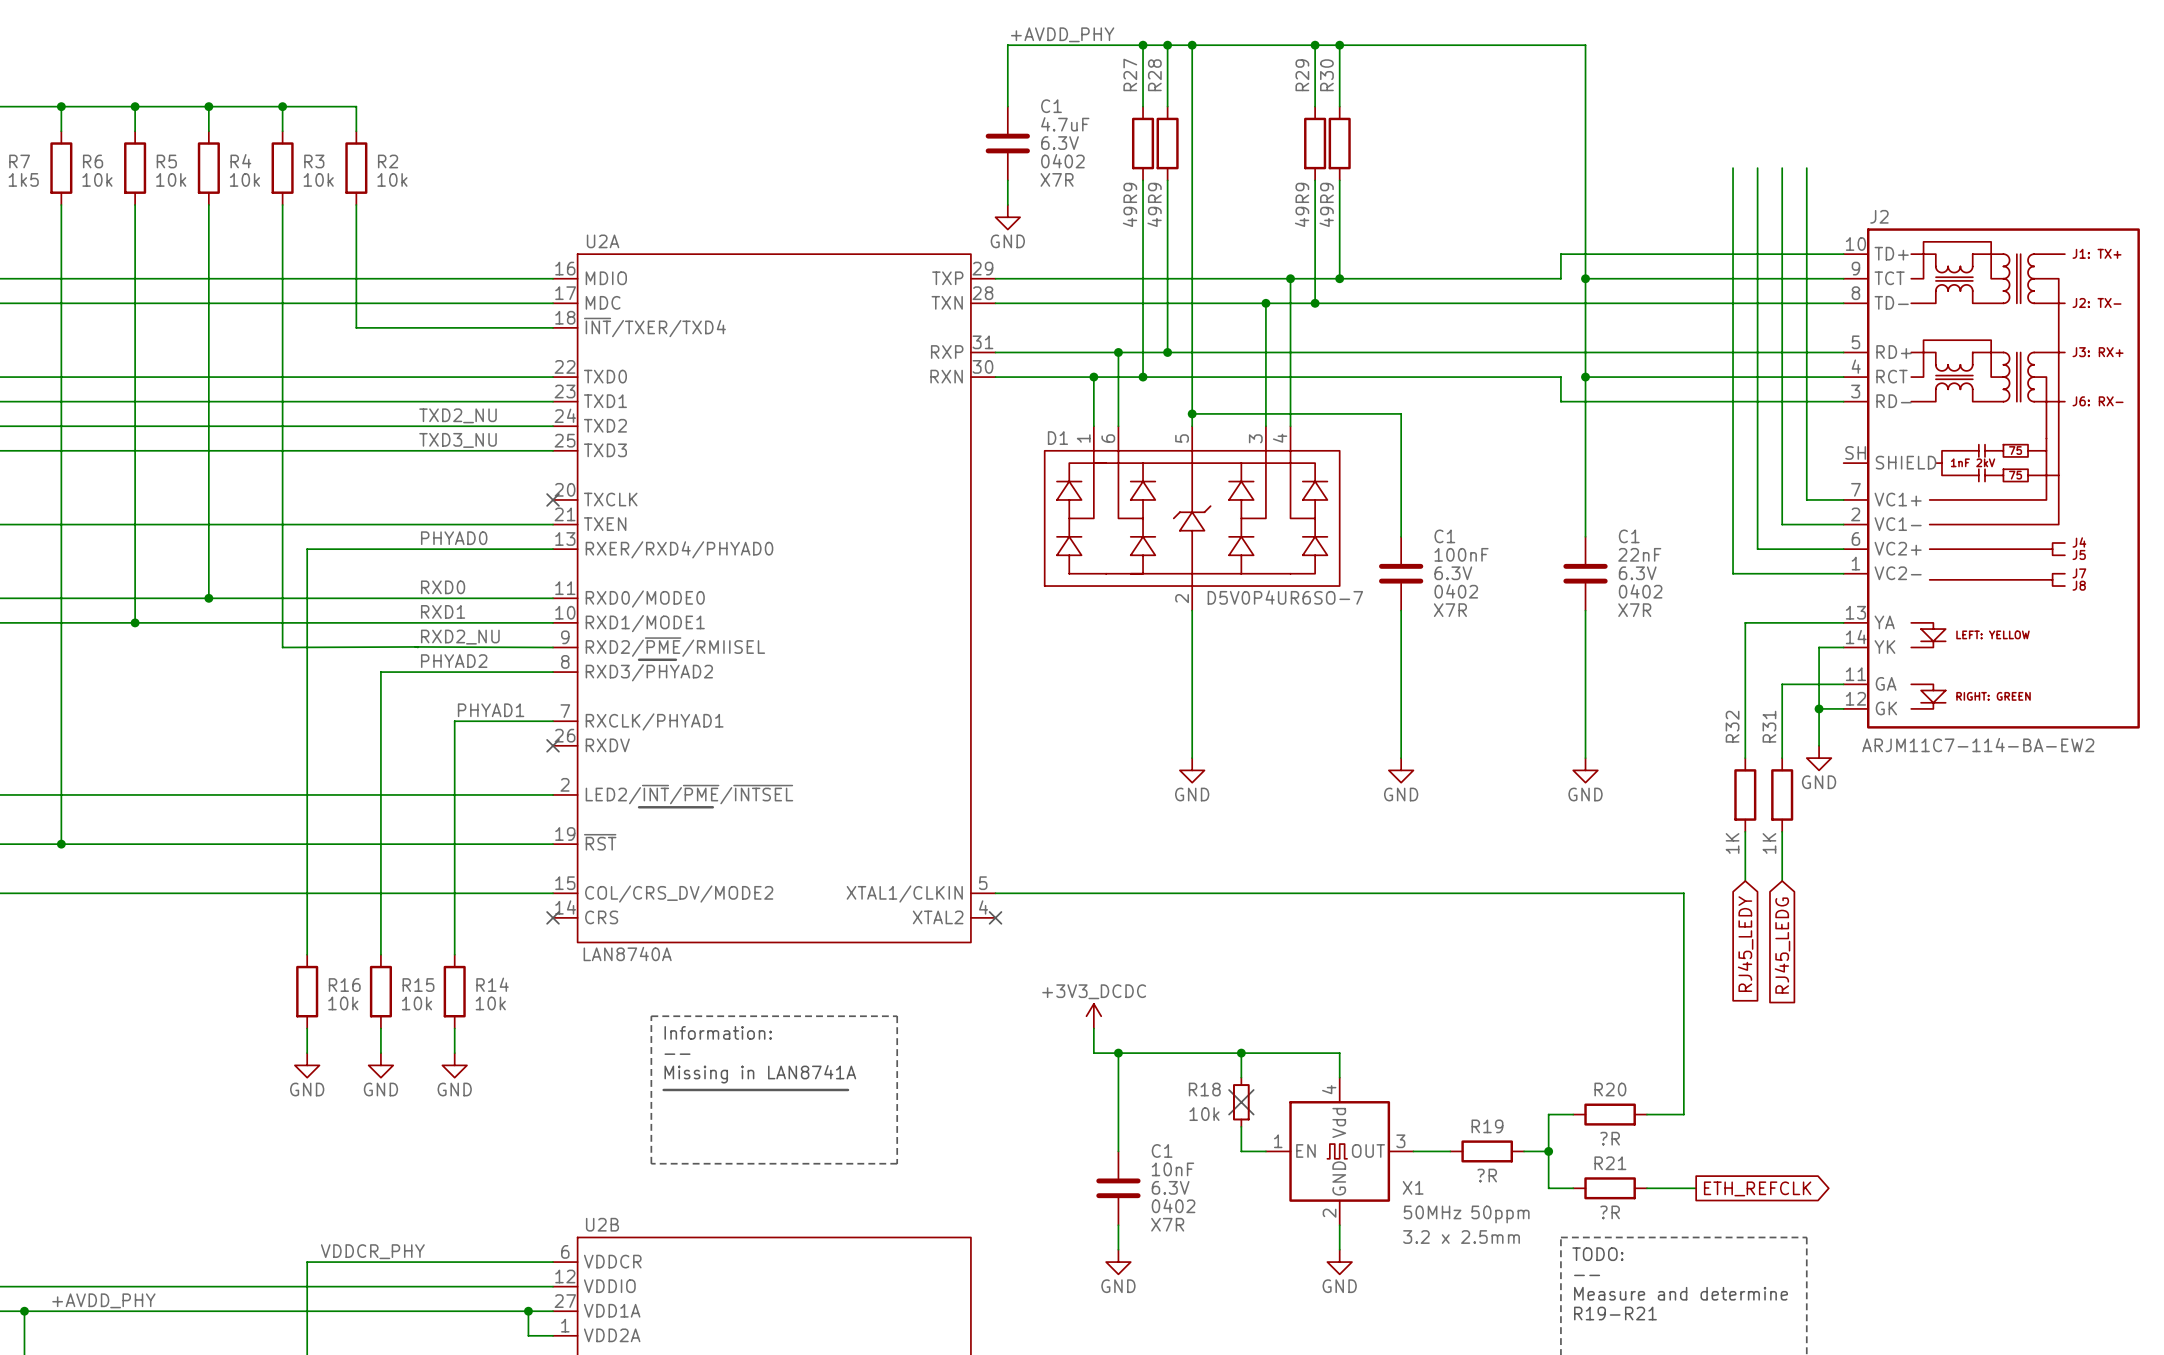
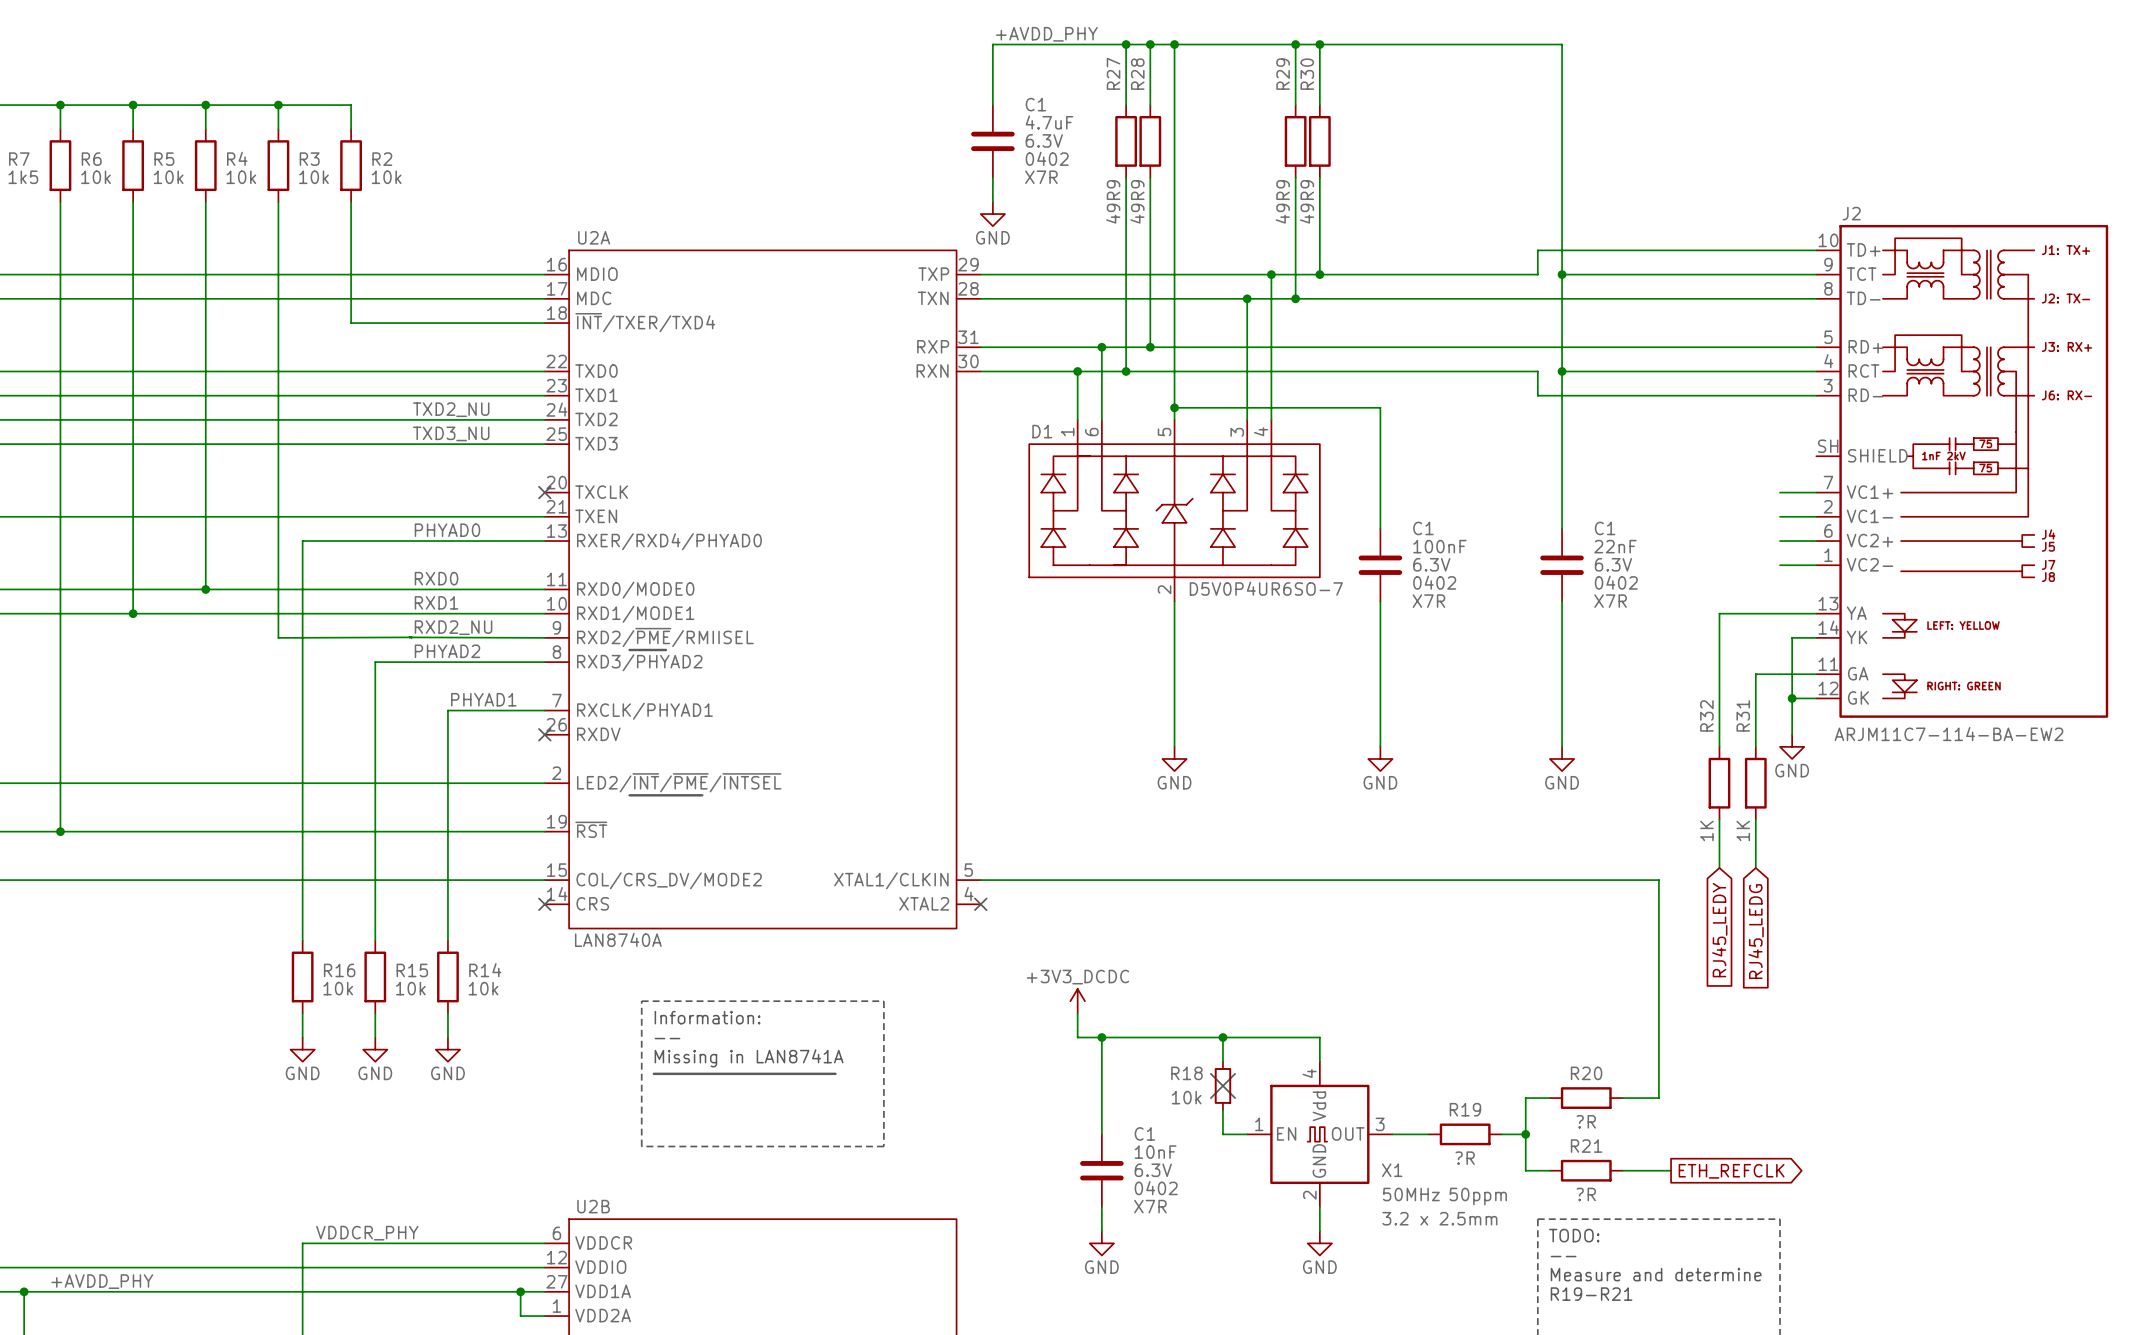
wire: (1733, 168) (1733, 573) (1806, 573) -> none
wire: (1757, 168) (1757, 549) (1806, 549) -> none
wire: (1782, 168) (1782, 524) (1806, 524) -> none
wire: (1806, 168) (1806, 499) -> none

